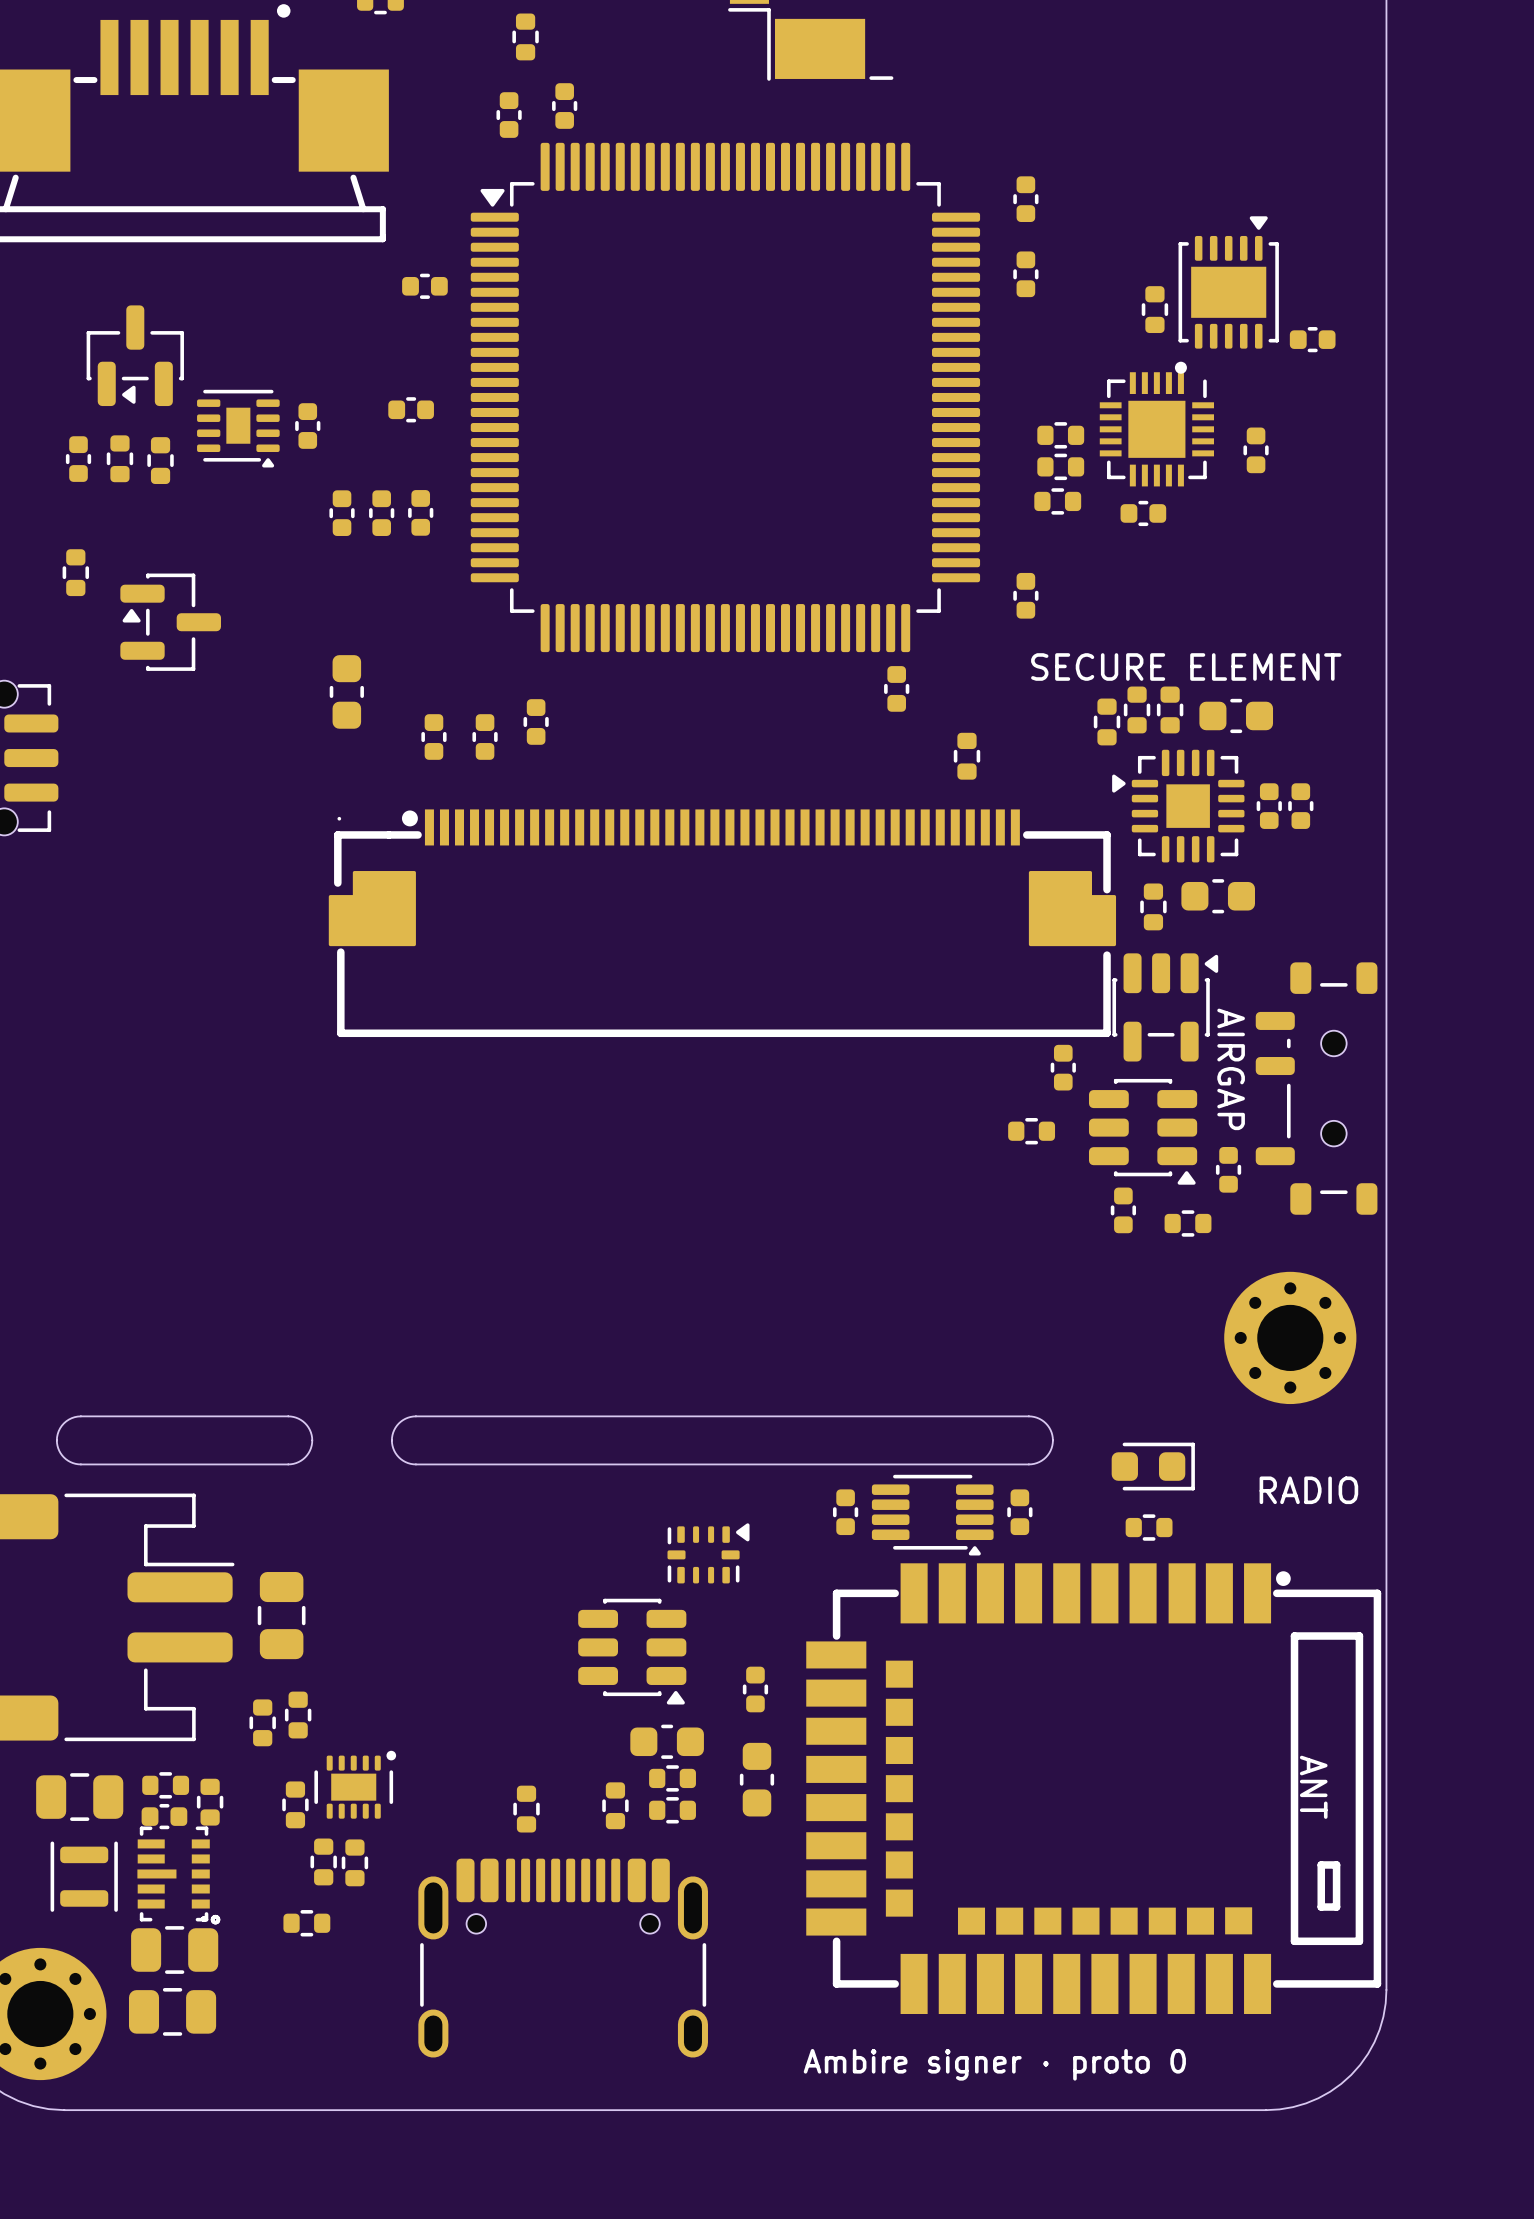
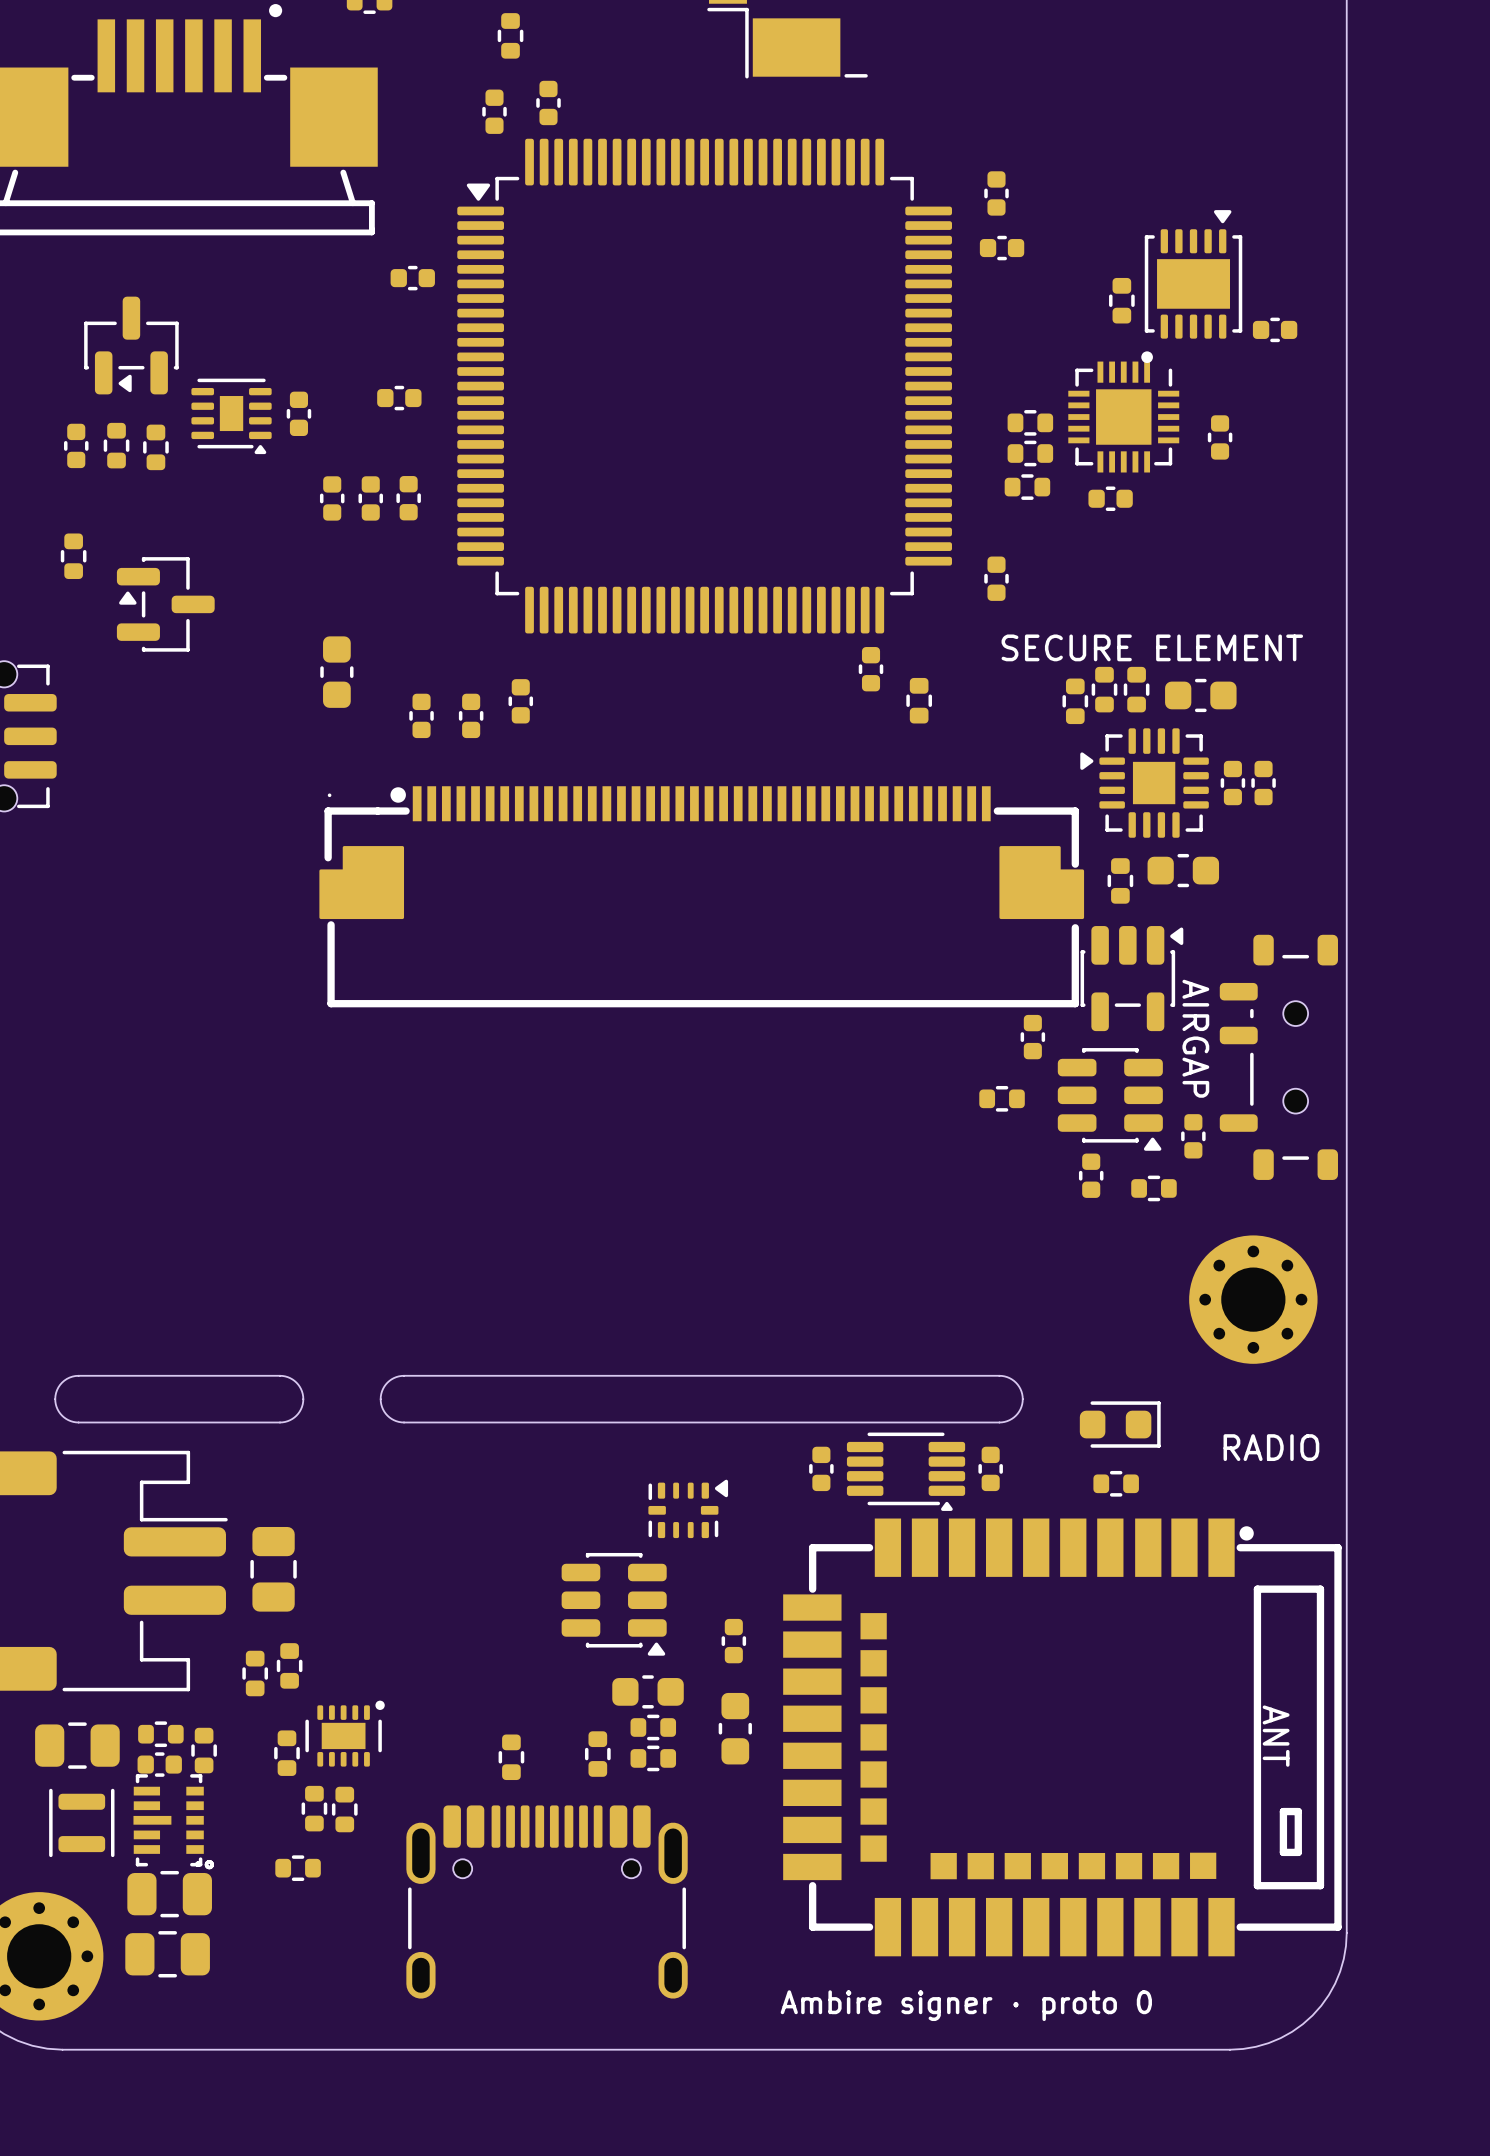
part rotation: 0° (1025, 274) -> 90° clockwise (1002, 248)
part position: (966, 756) -> (919, 700)

